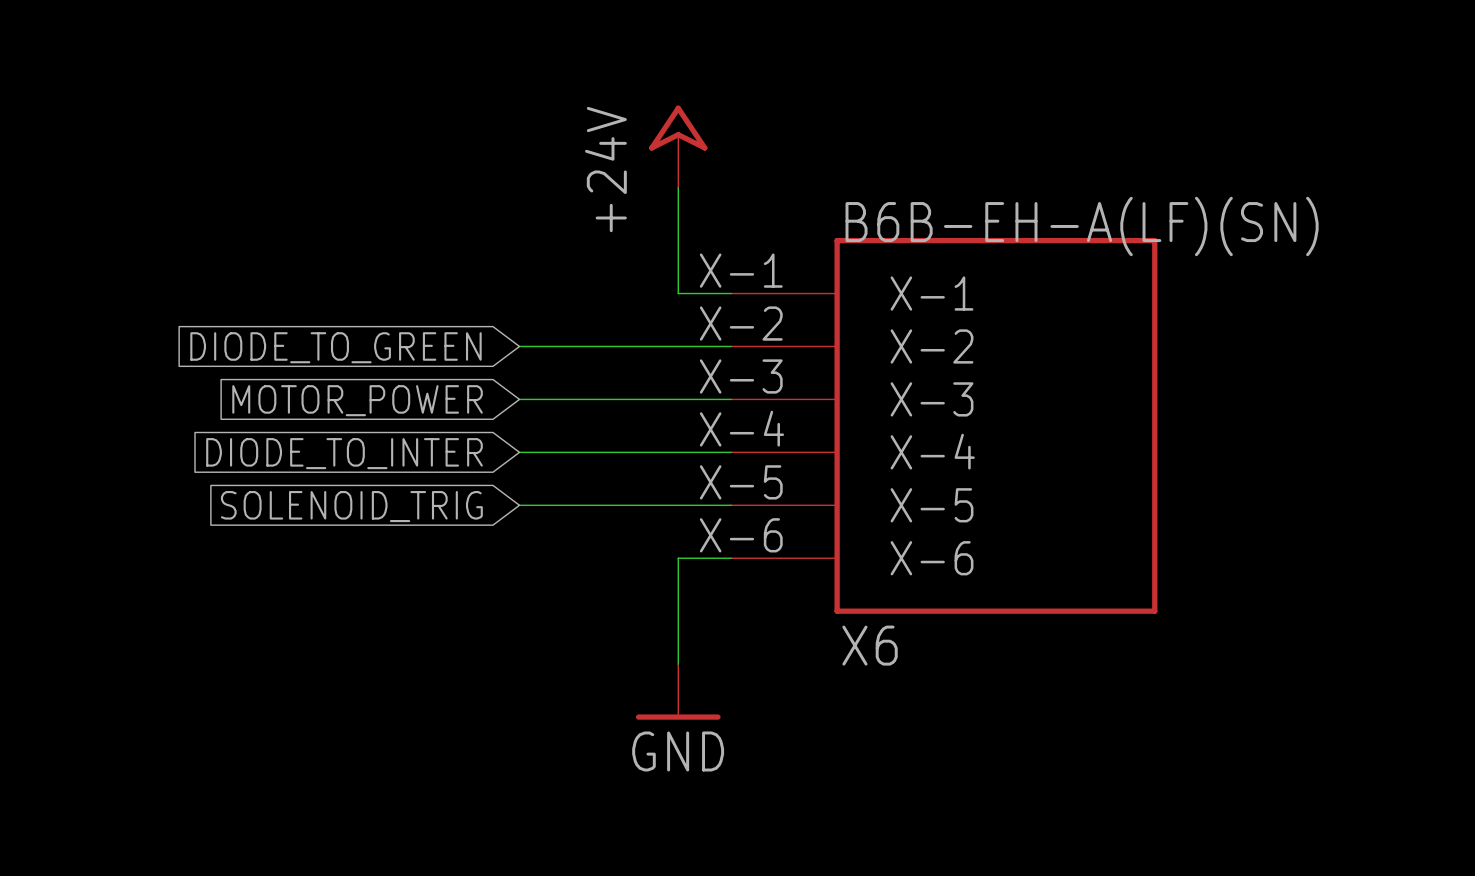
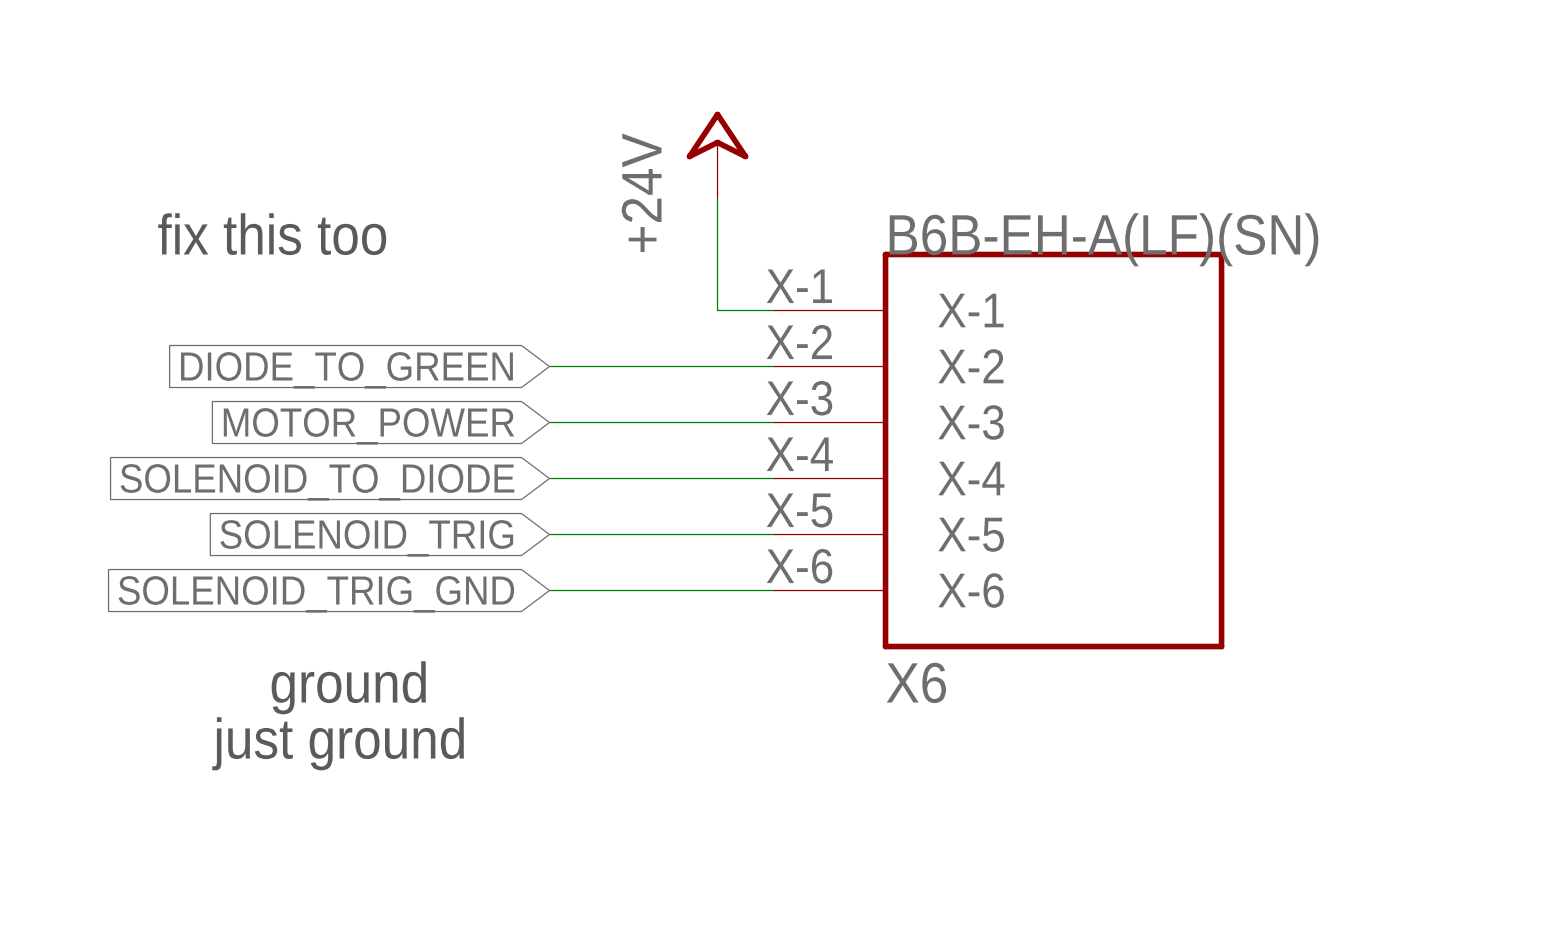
text: none -> fix this too (272, 234)
global label: DIODE_TO_INTER (344, 453) -> SOLENOID_TO_DIODE (317, 482)
wire: (678, 558) (678, 664) -> (717, 590) (549, 590)
global label: none -> SOLENOID_TRIG_GND (316, 594)
text: none -> ground (348, 687)
power symbol: GND (678, 691) -> none
text: none -> just ground (338, 743)

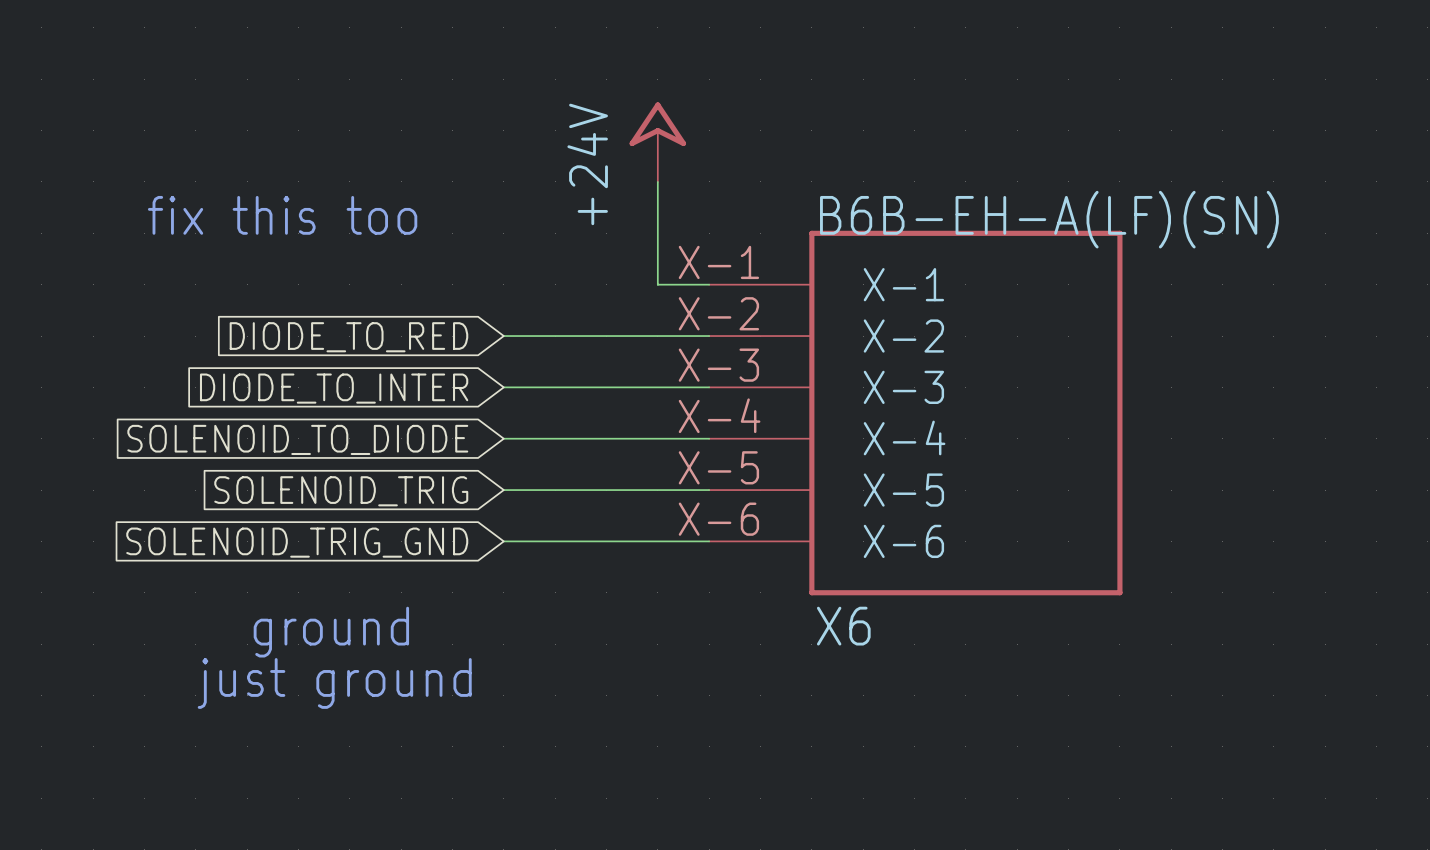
global label: DIODE_TO_GREEN (346, 370) -> DIODE_TO_RED (348, 337)
global label: MOTOR_POWER (369, 426) -> DIODE_TO_INTER (334, 388)

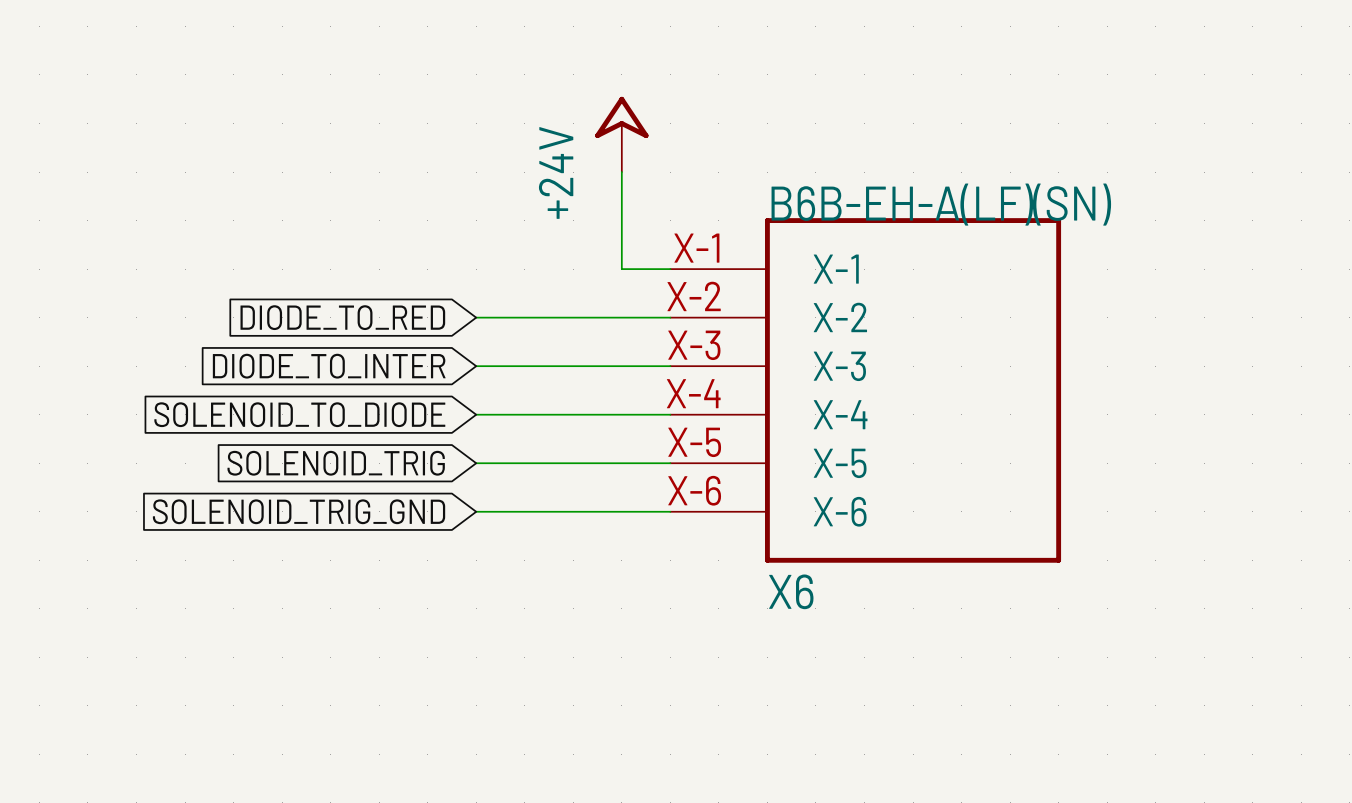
text: fix this too (282, 215) -> none
text: ground (331, 632) -> none
text: just ground (334, 683) -> none

